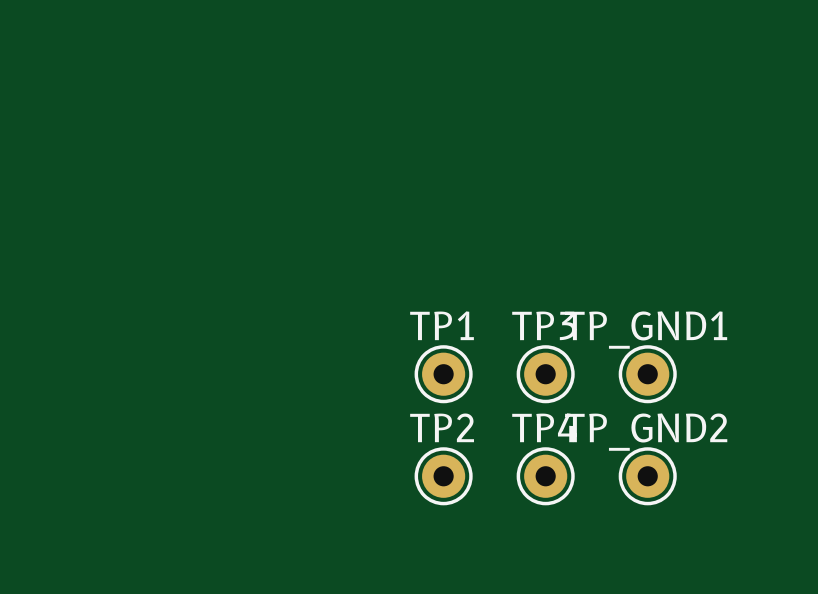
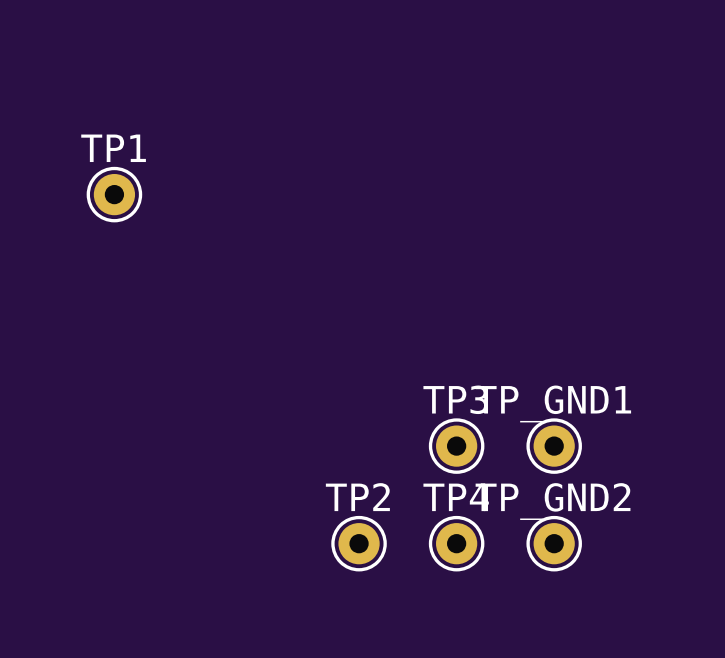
TP1 position: (443, 374) -> (114, 194)

